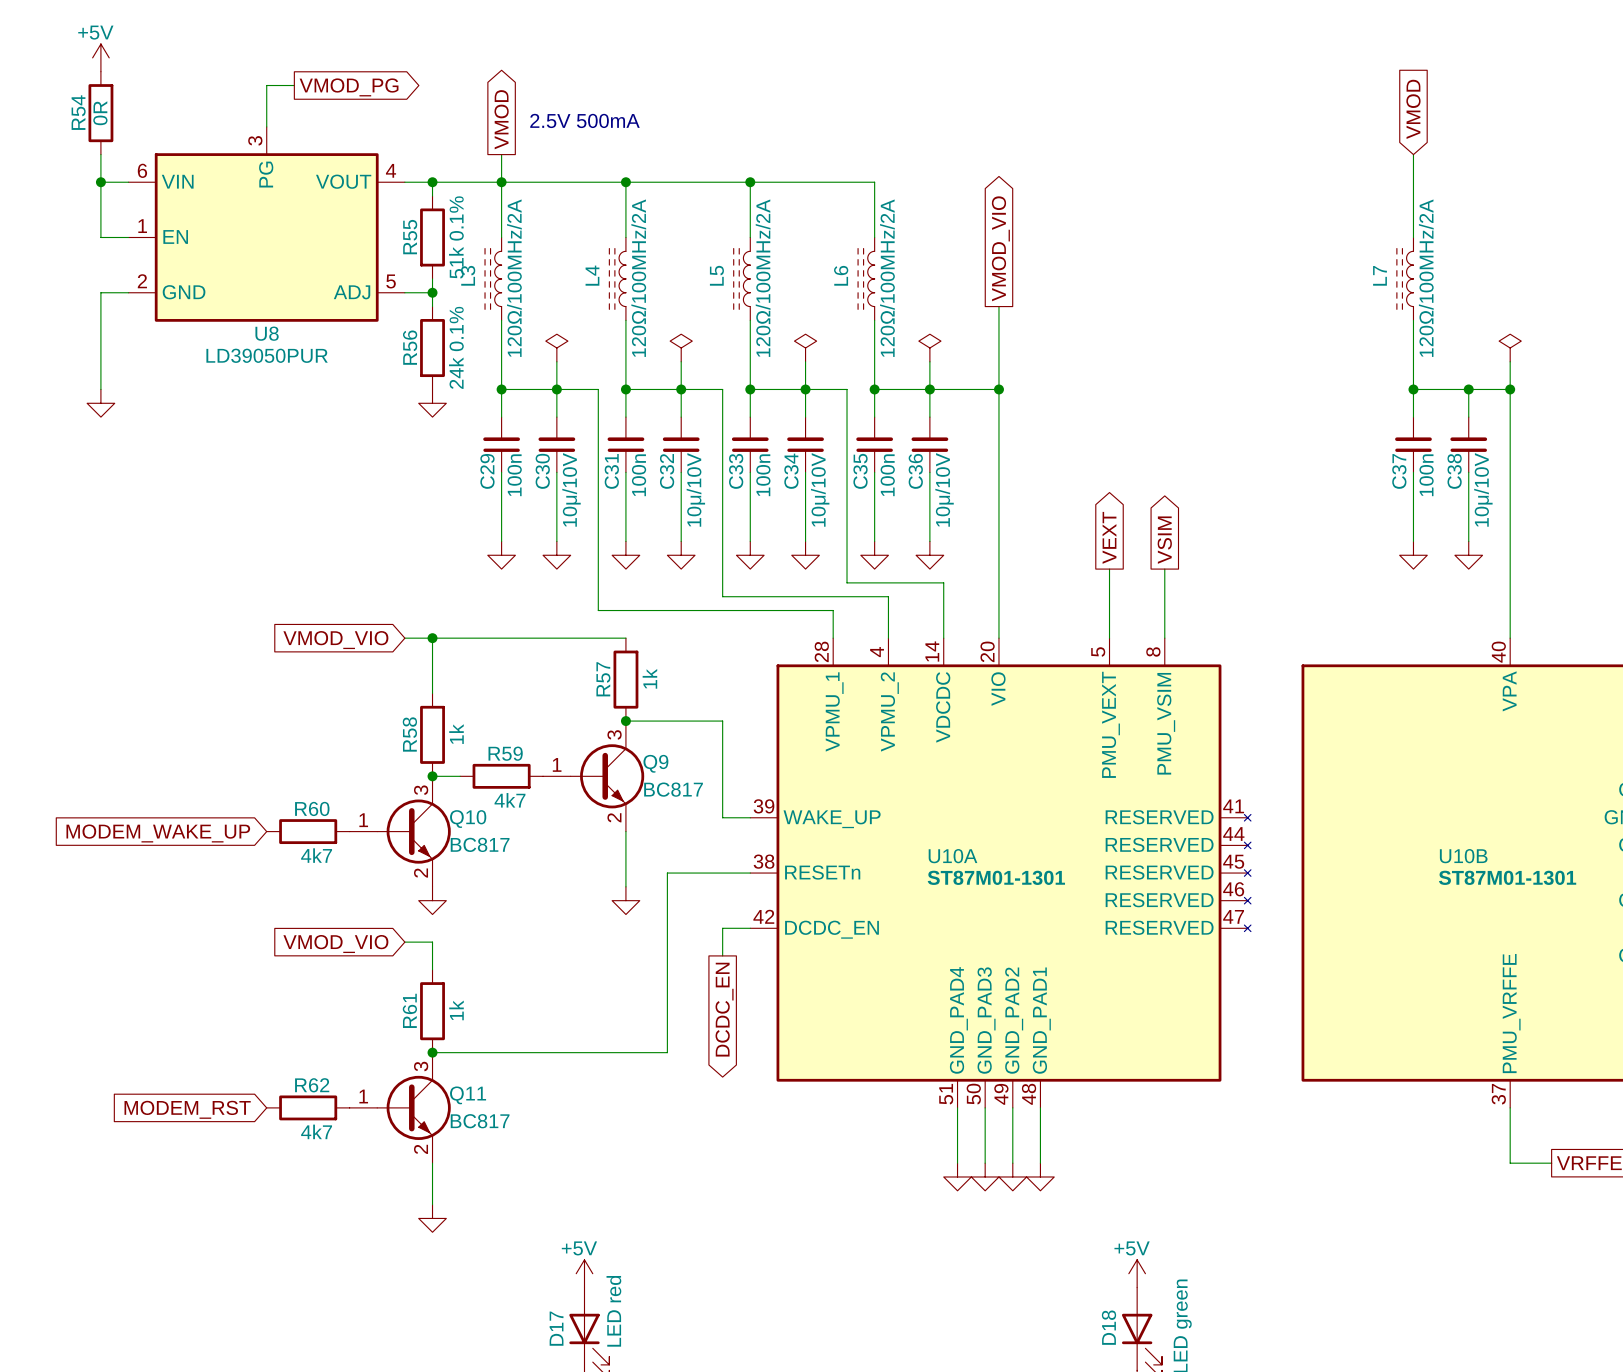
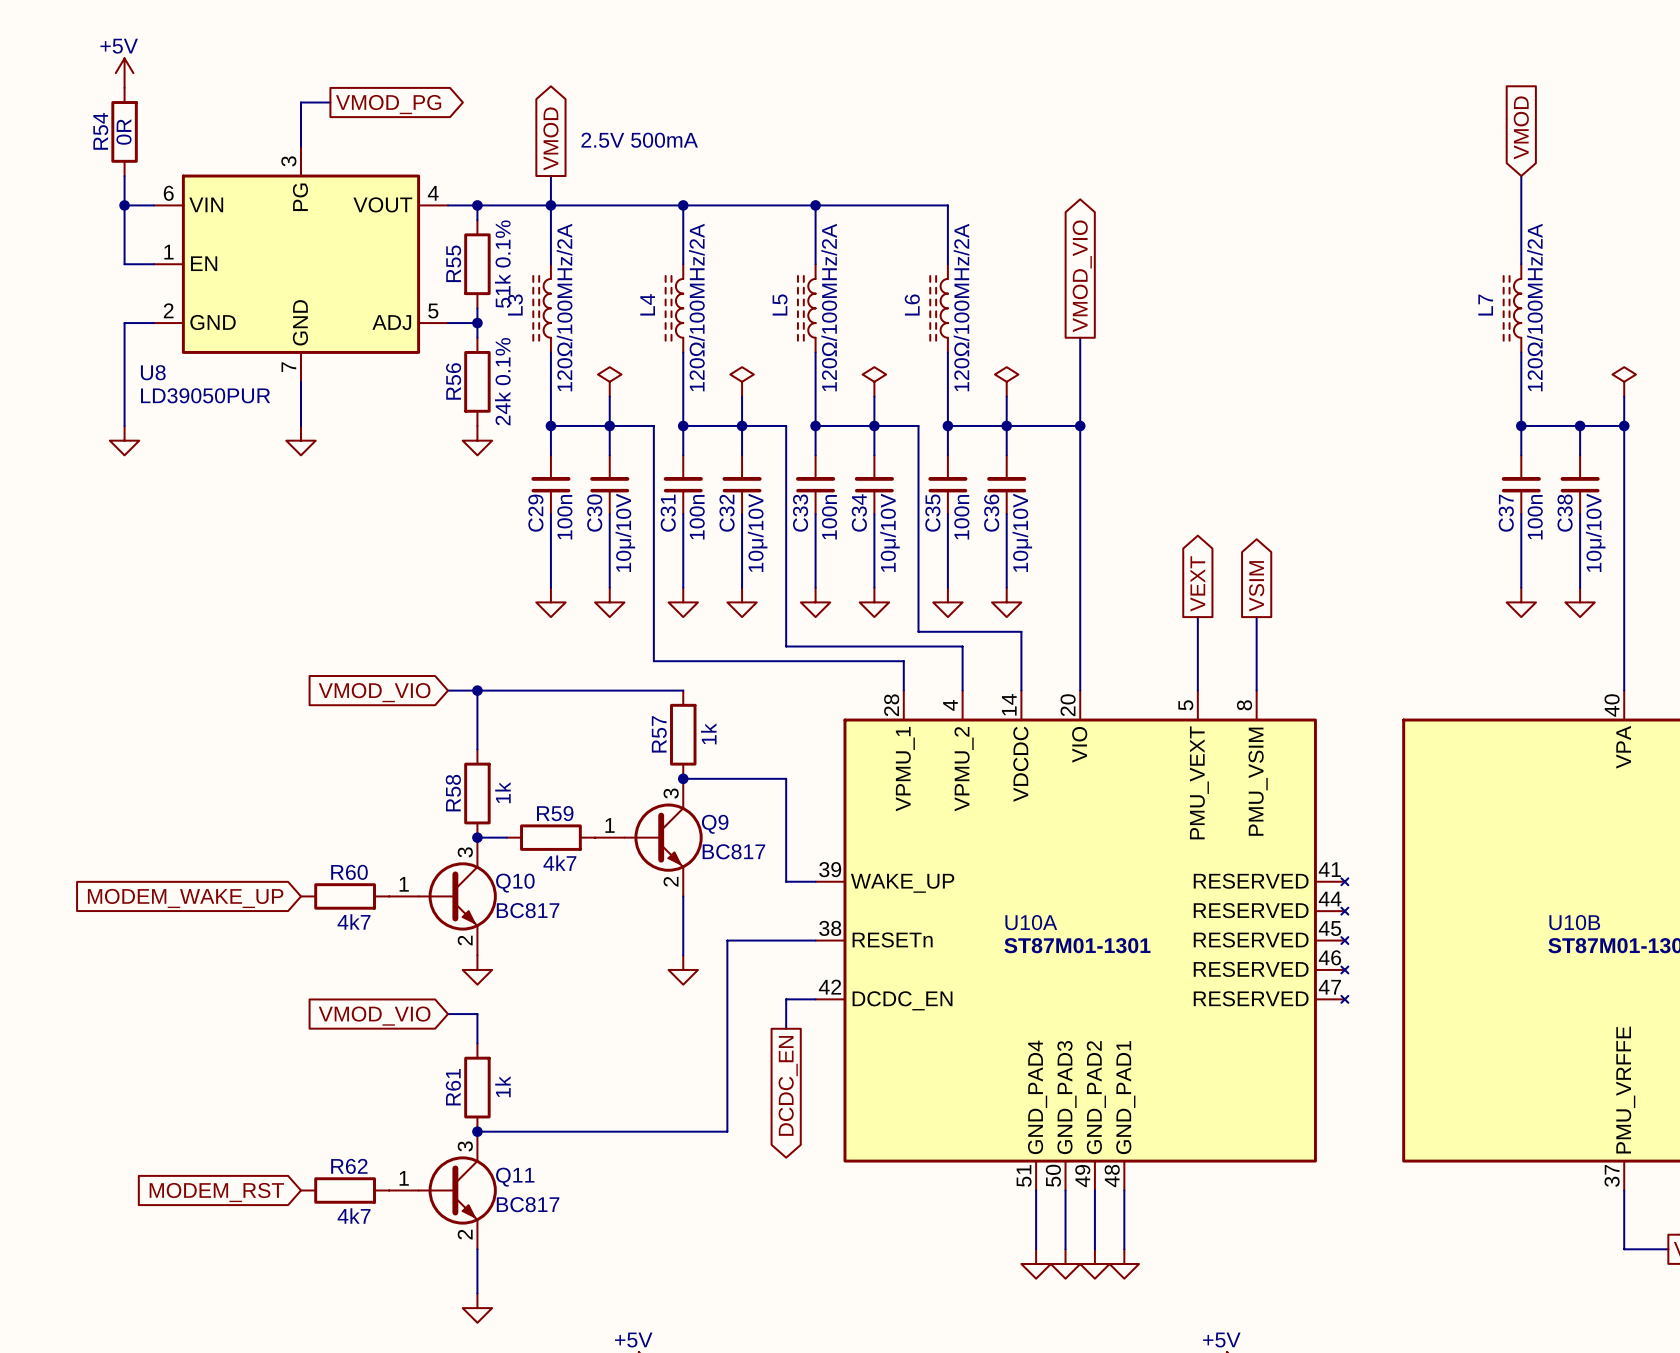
U8 symbol: [128, 126, 405, 322] -> [153, 146, 449, 382]
U8 name position: U8 (267, 333) -> U8 (153, 372)
wire: none -> (300, 381) (300, 425)
U8 value position: LD39050PUR (267, 355) -> LD39050PUR (205, 395)
power symbol: none -> (300, 440)

